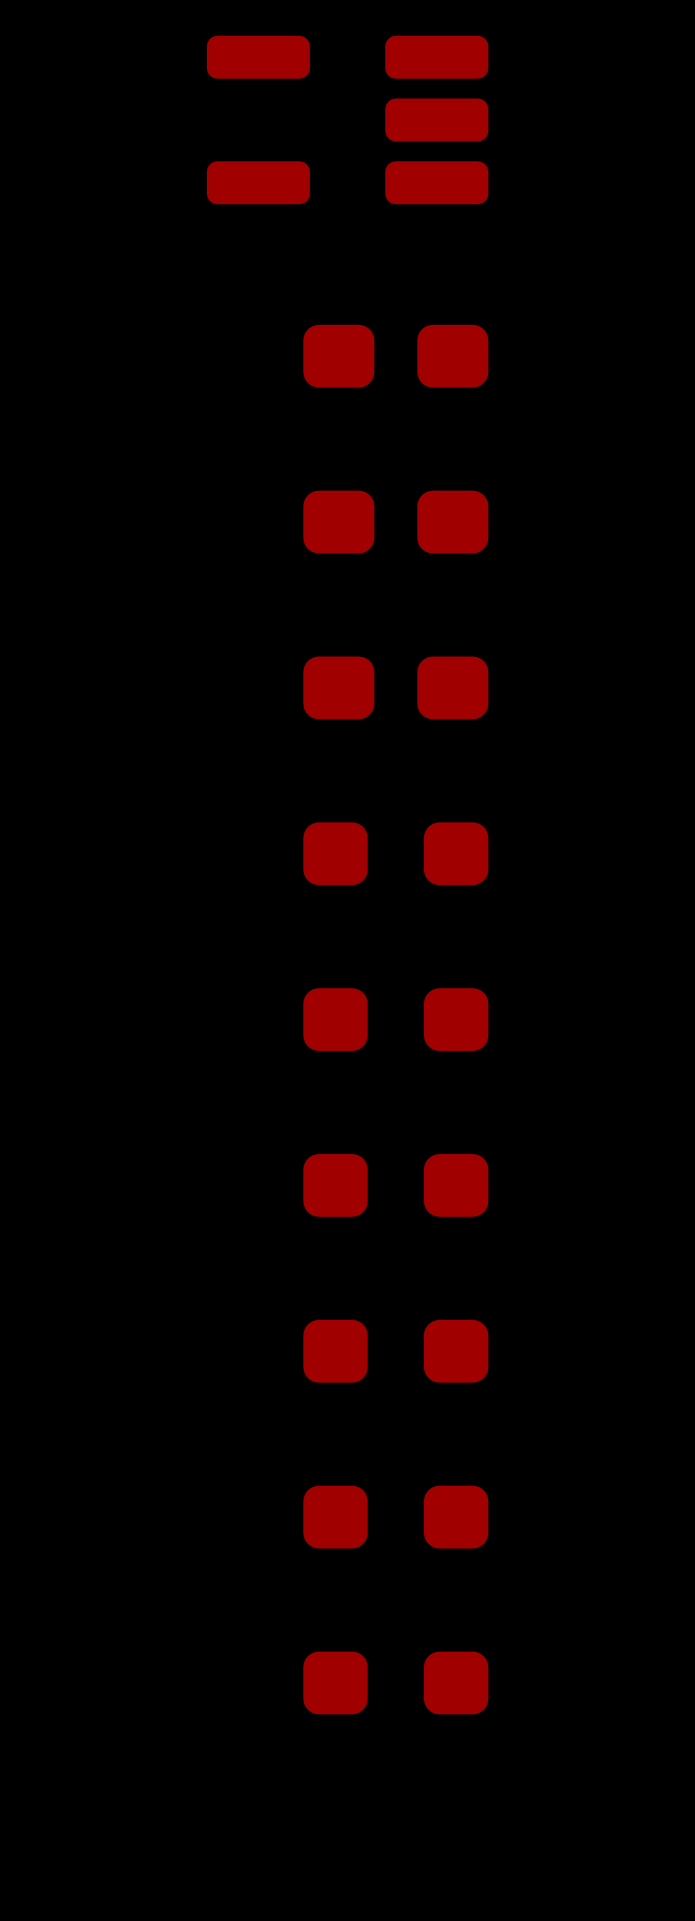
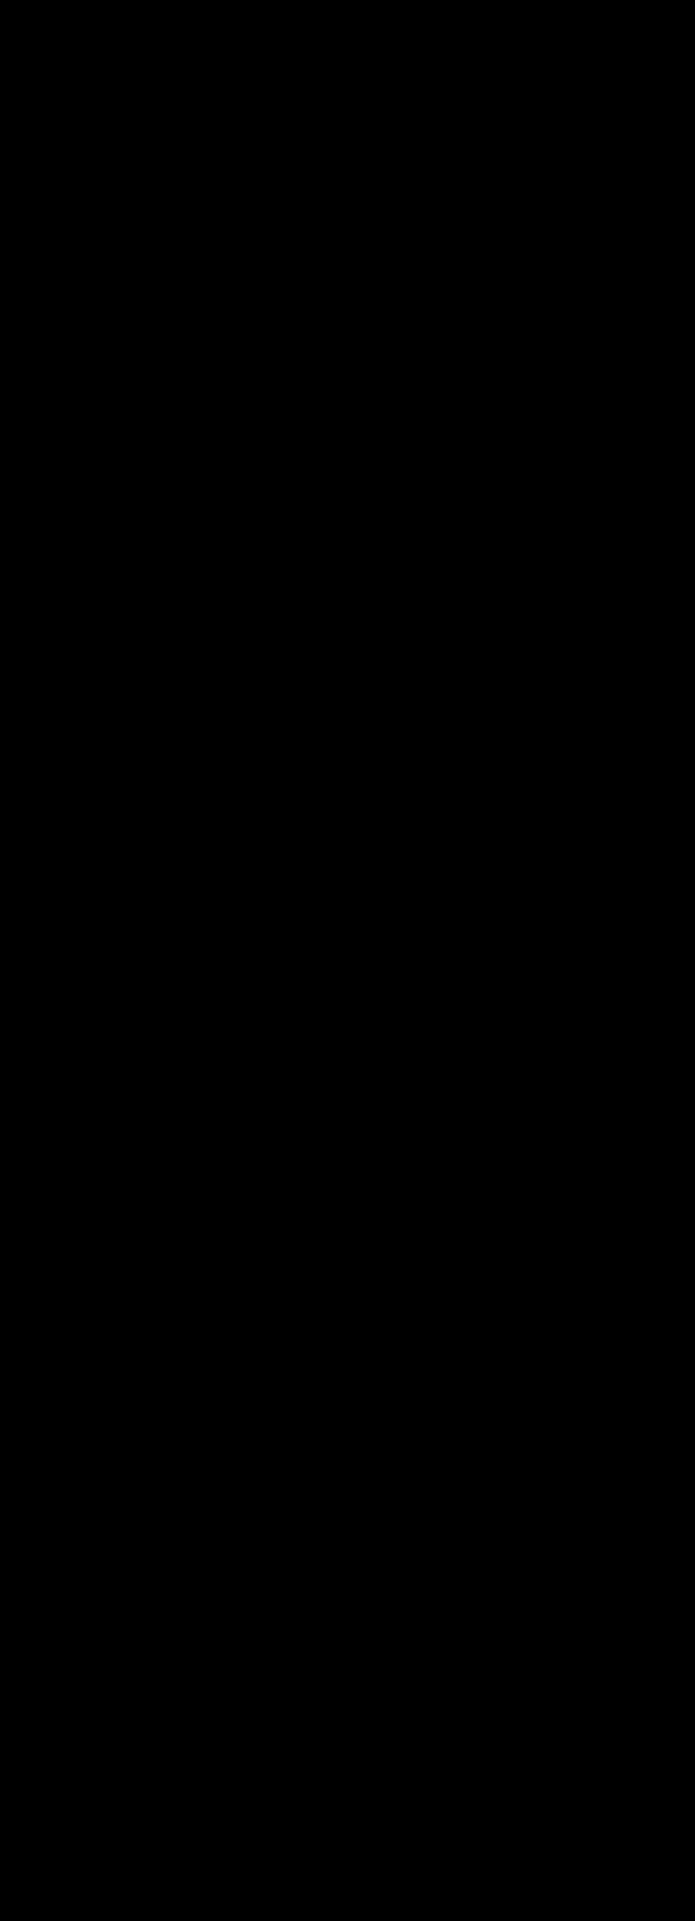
part: (347, 119) -> none
part: (395, 356) -> none
part: (395, 522) -> none
part: (395, 687) -> none
part: (395, 853) -> none
part: (395, 1019) -> none
part: (395, 1185) -> none
part: (395, 1351) -> none
part: (395, 1517) -> none
part: (395, 1682) -> none

